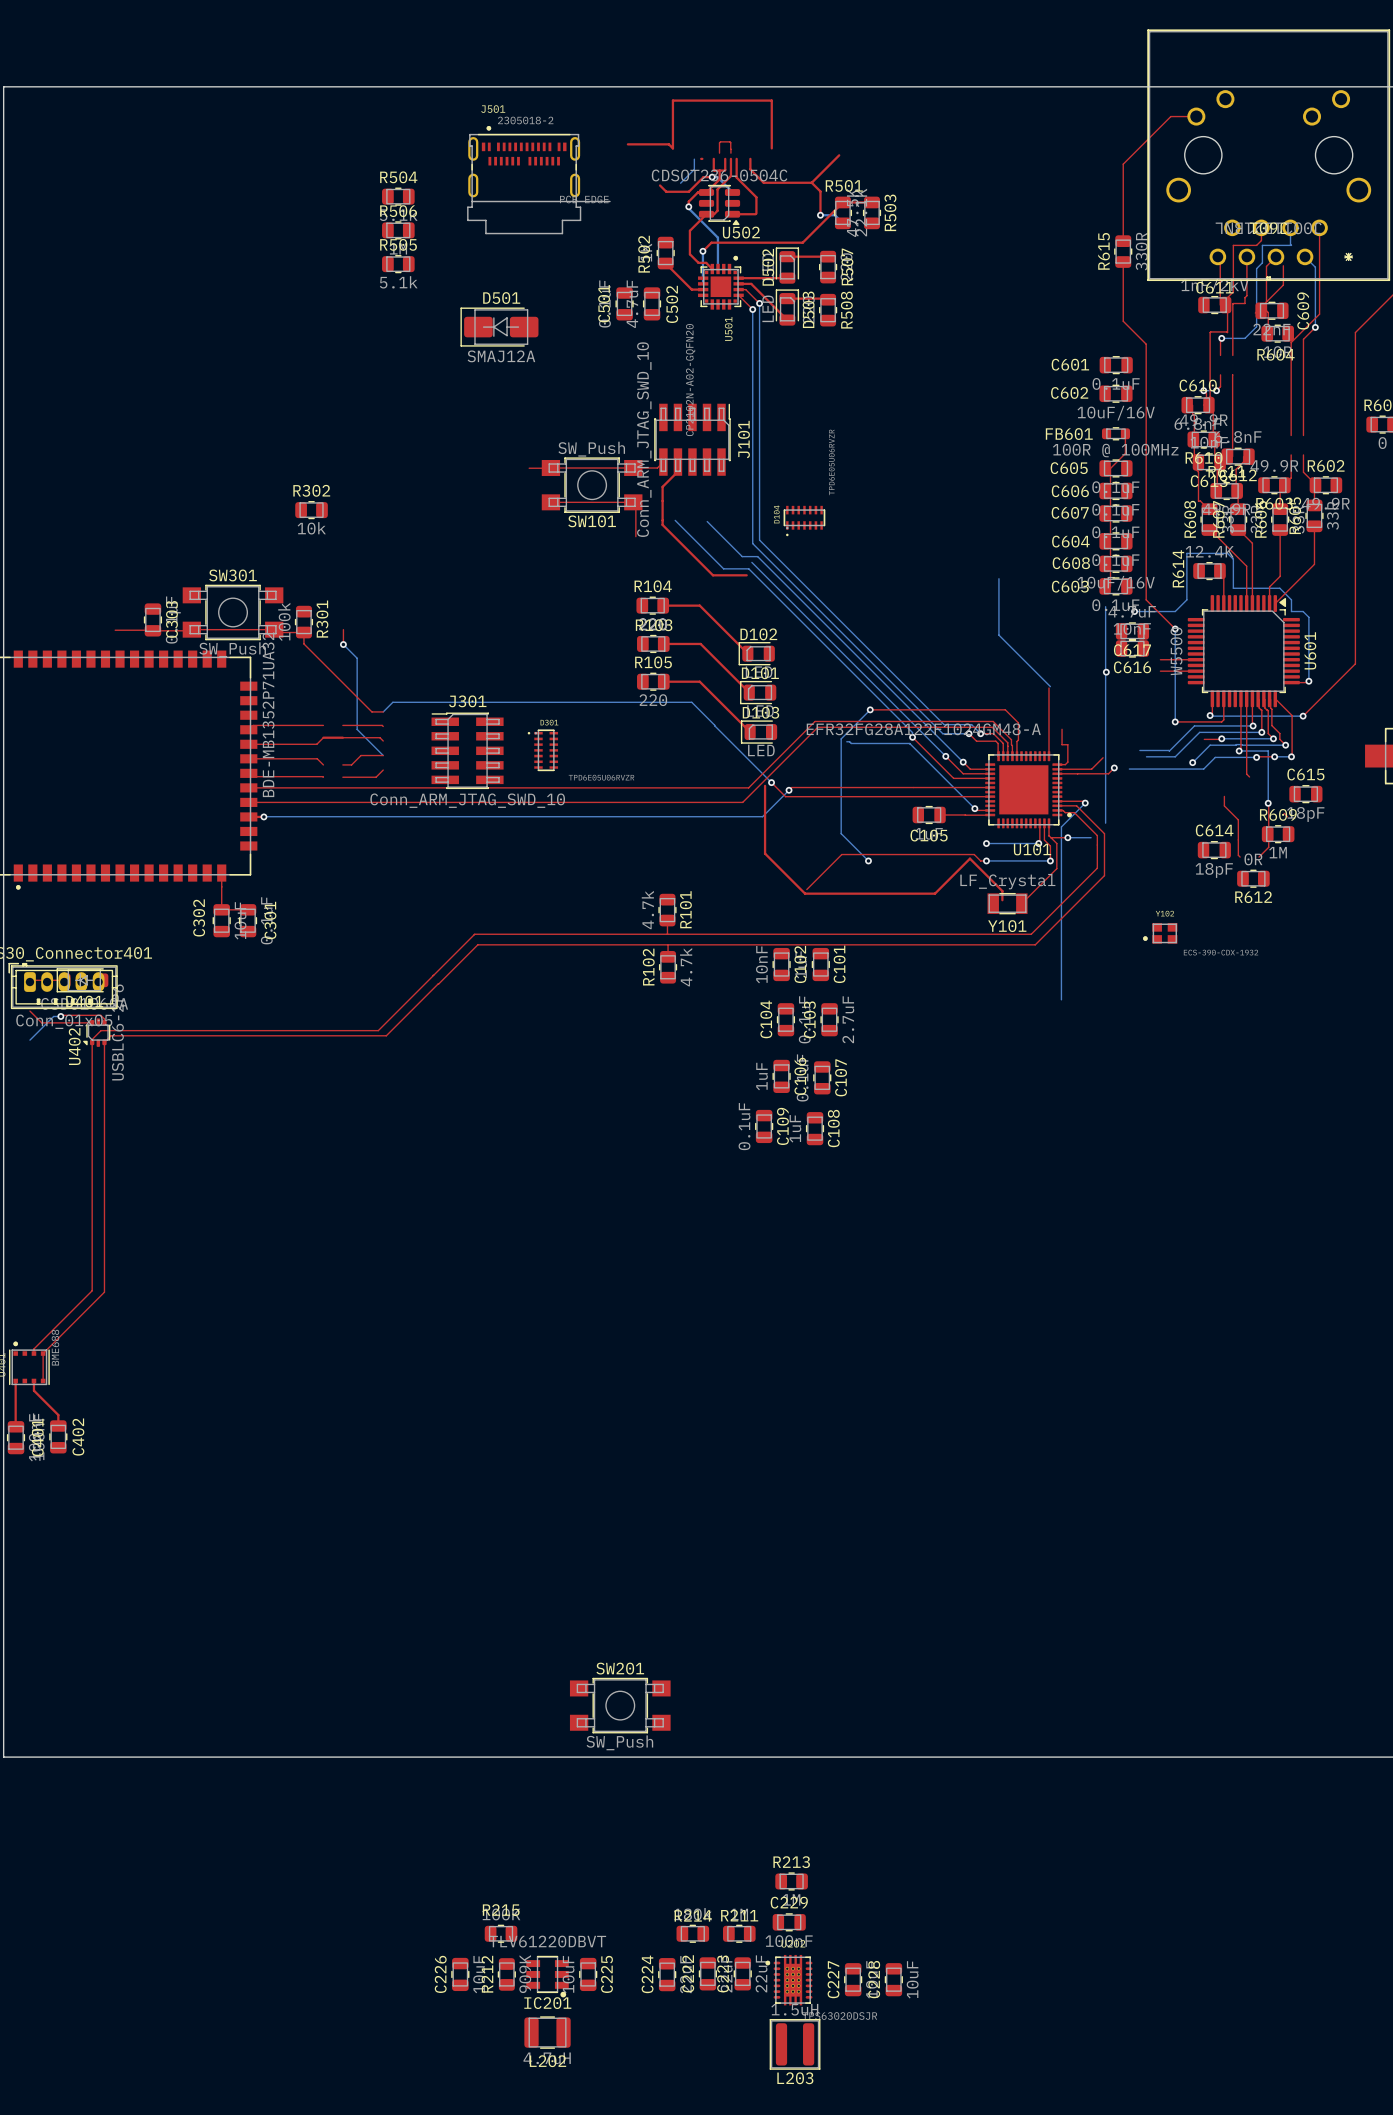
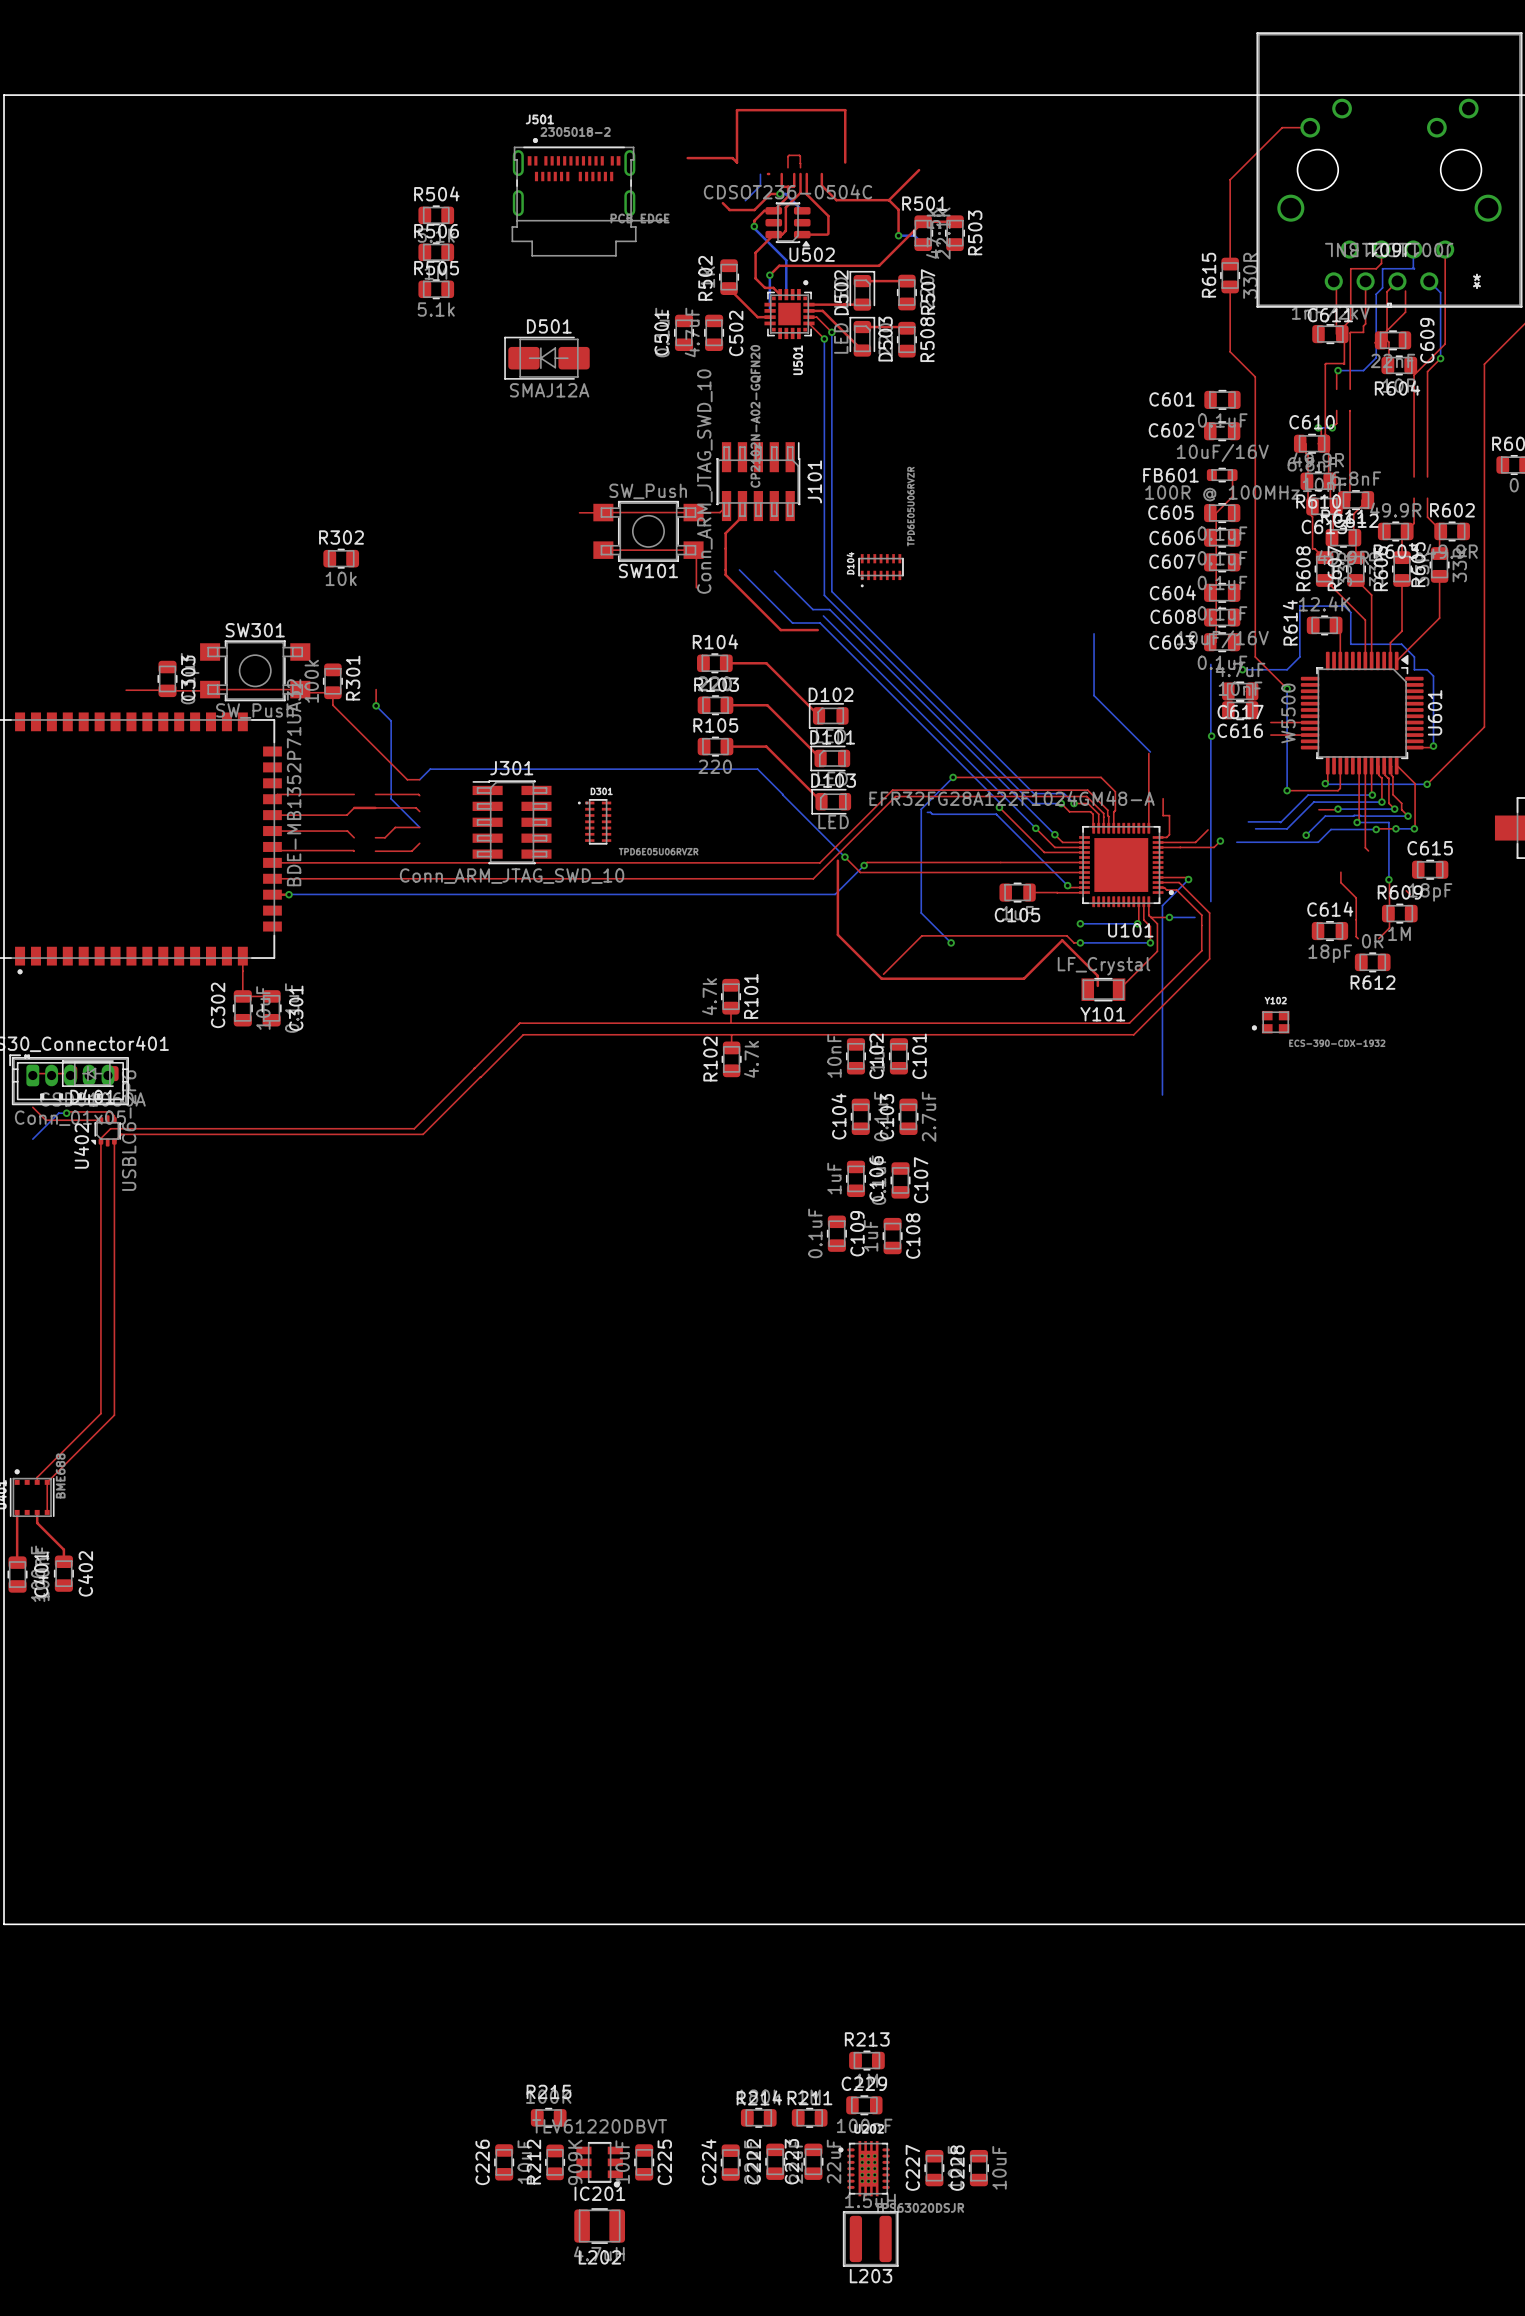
SW201: SW_Push (620, 1705) -> none

